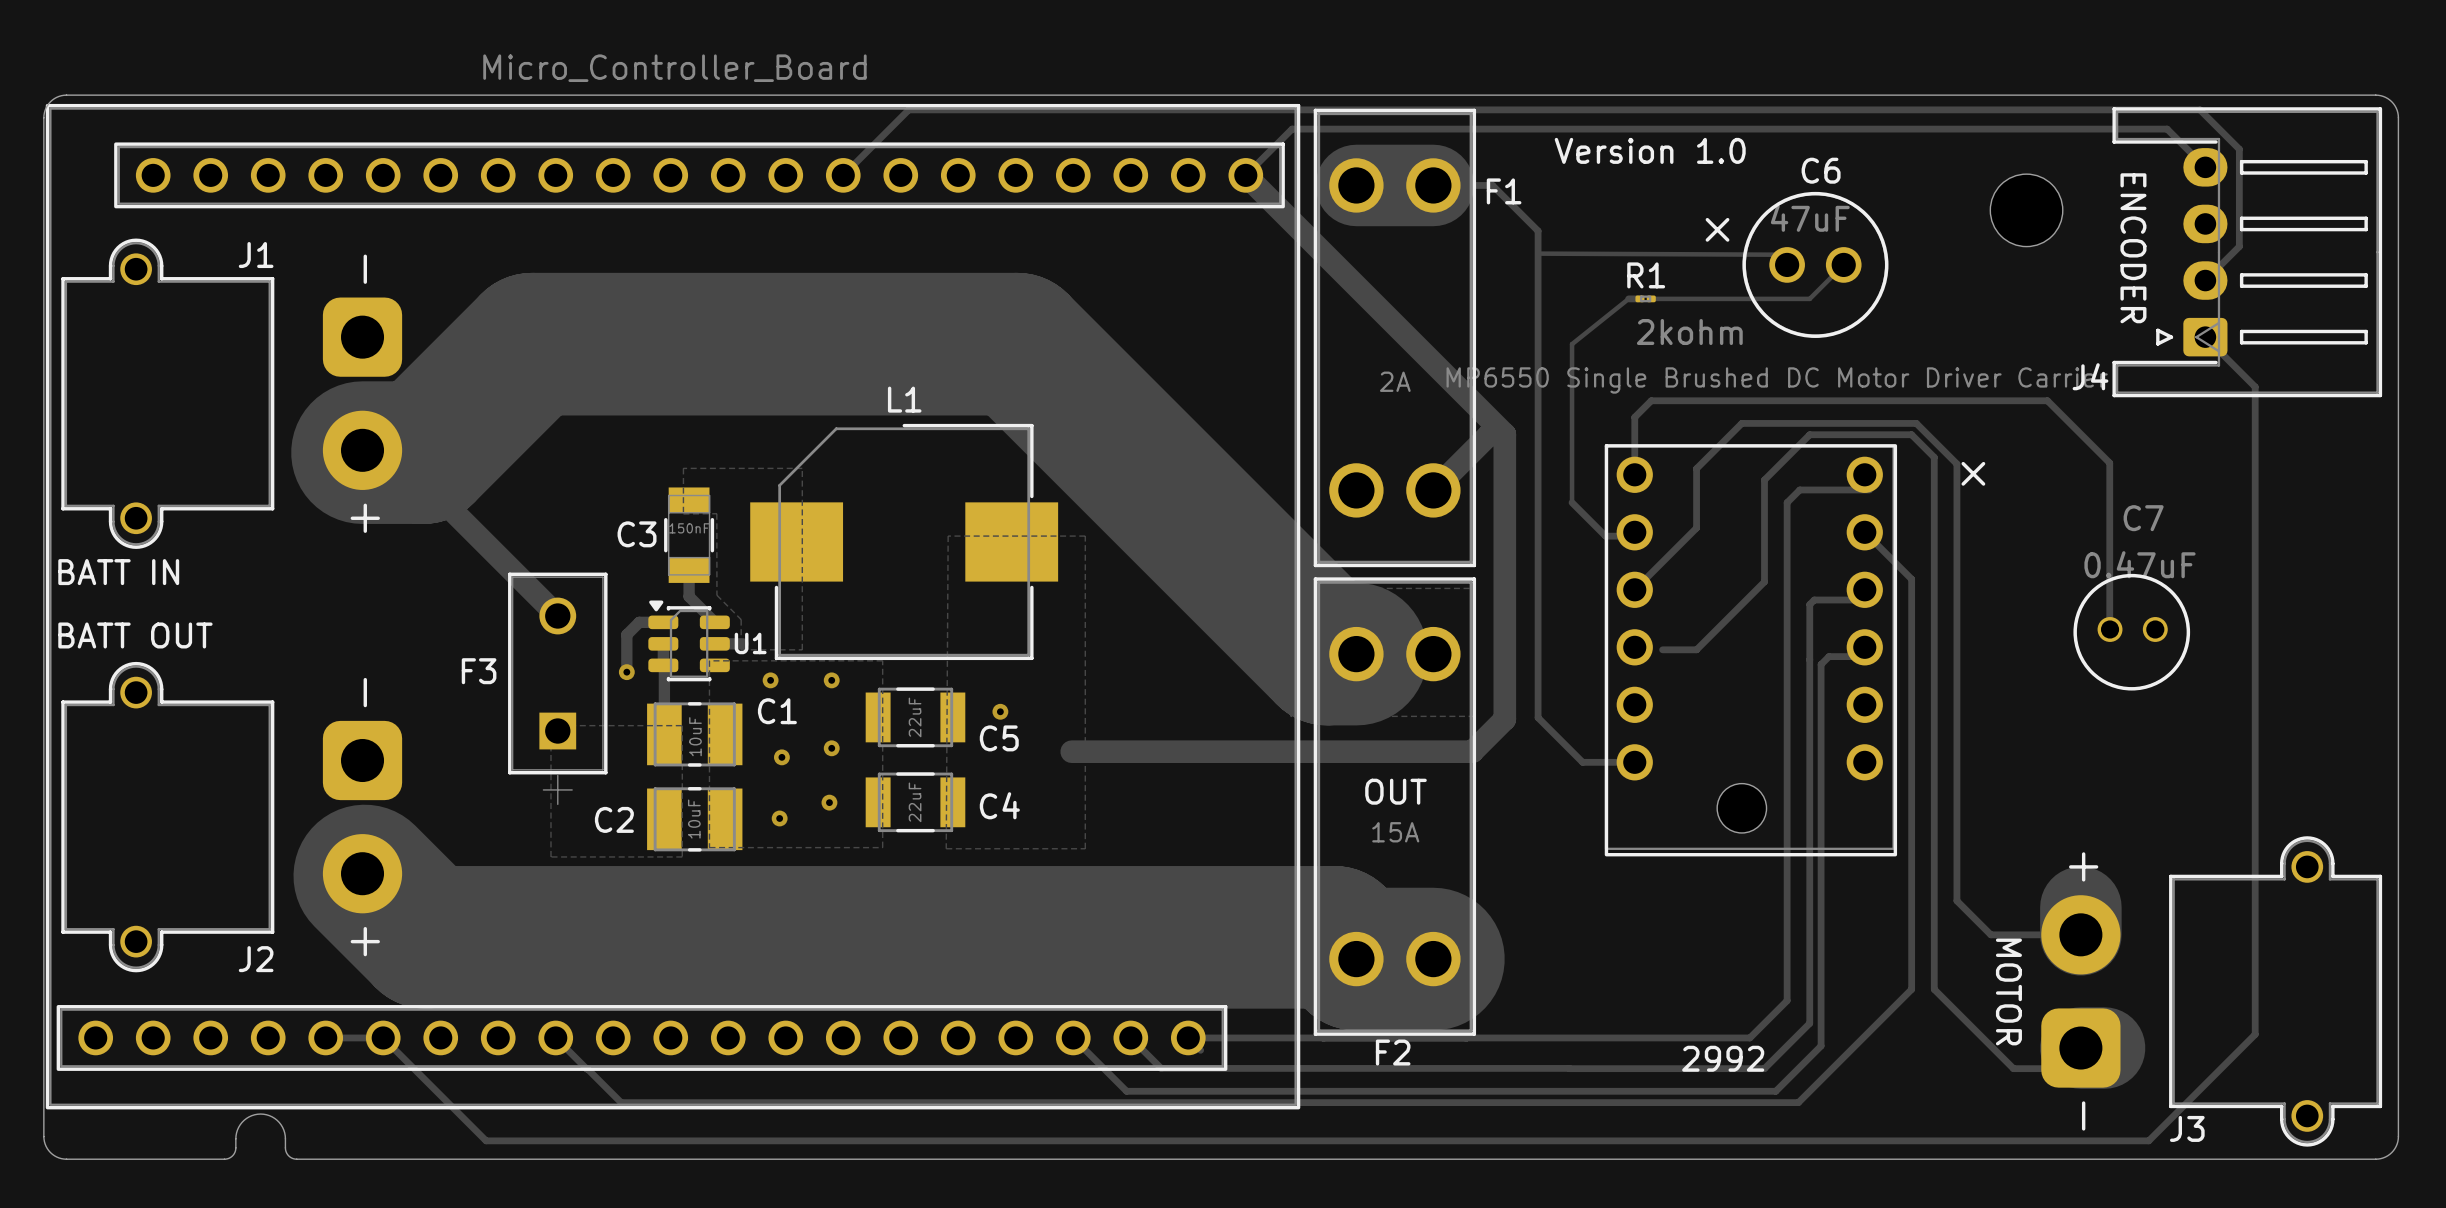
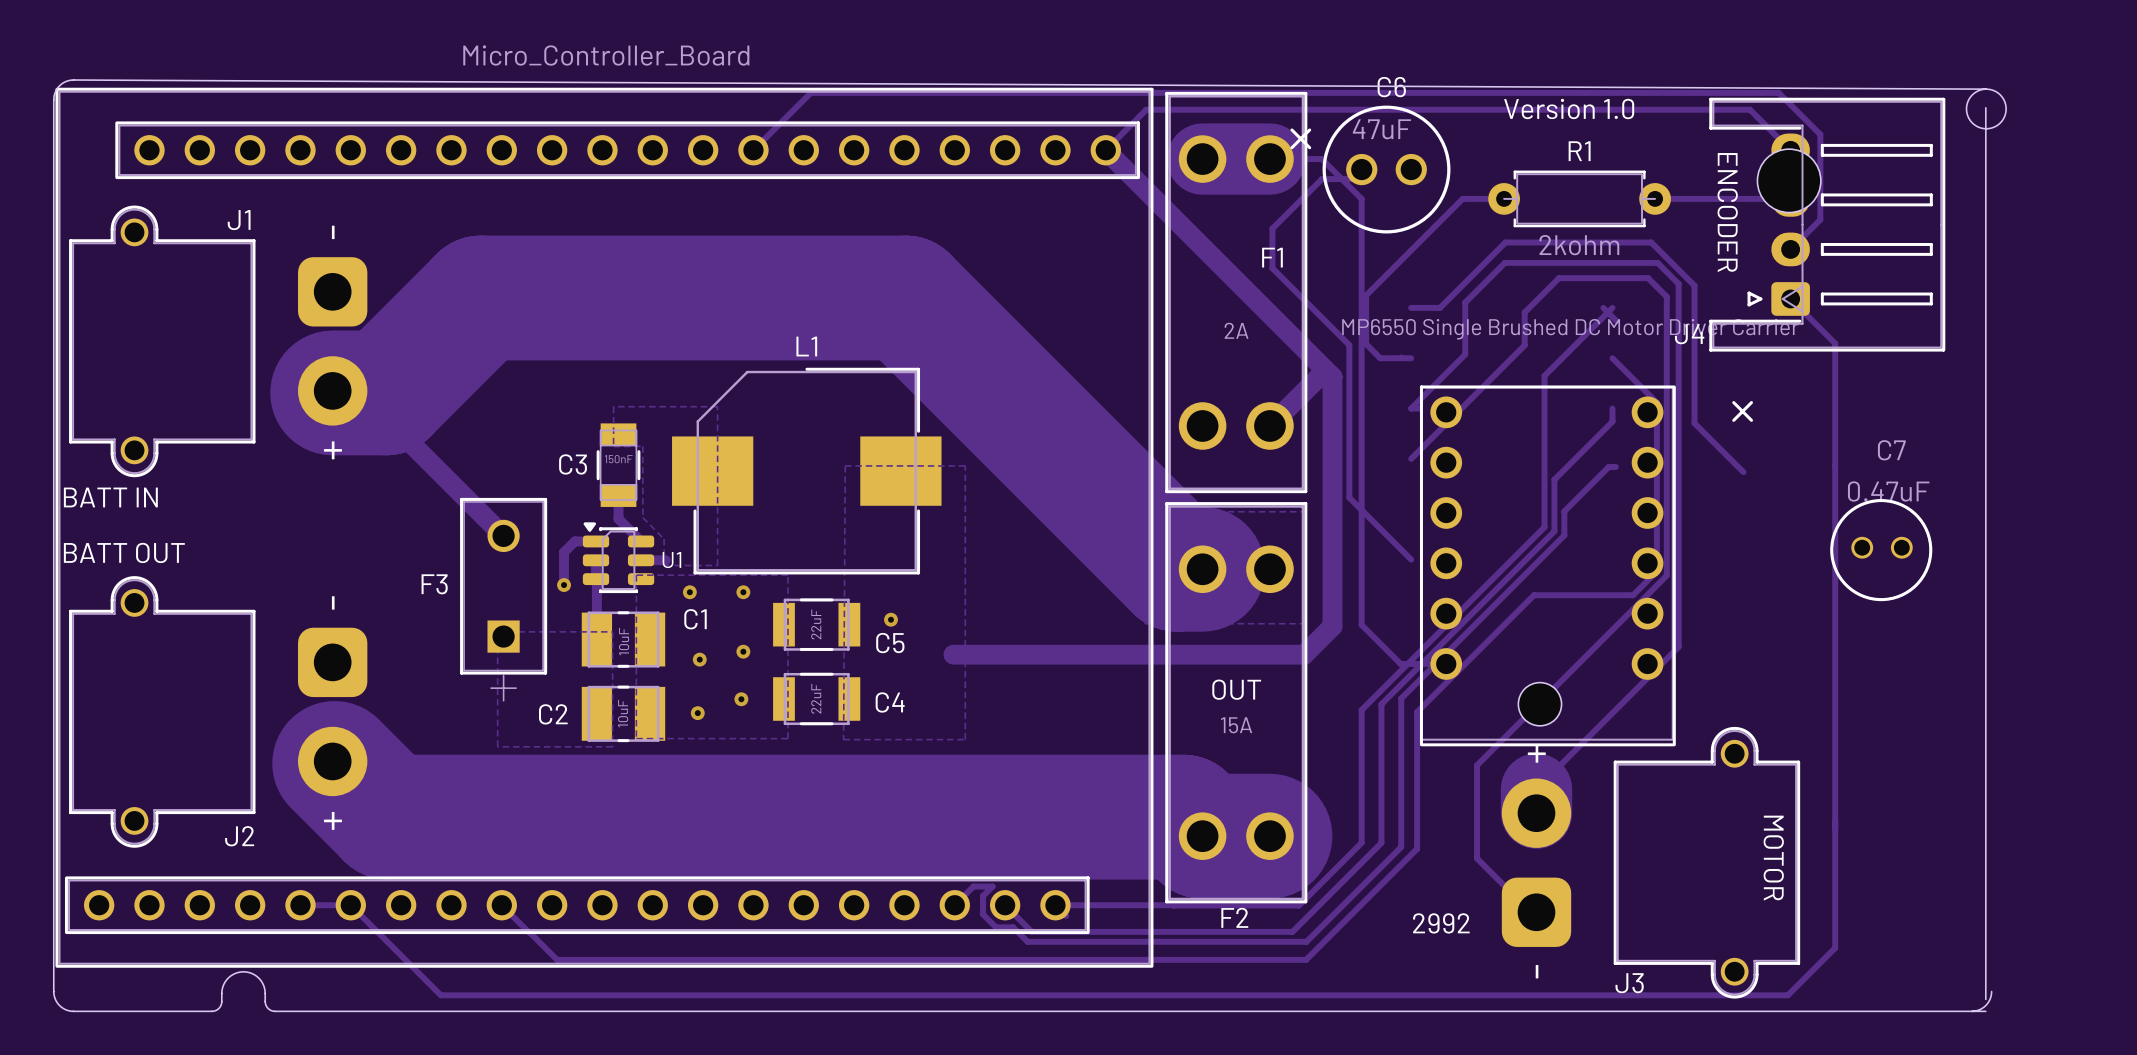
board edge: (66, 95) (2375, 95) (2385, 97) (2394, 105) (2398, 117) (2398, 1139) (2391, 1152) (2378, 1159) (2251, 1159) -> (73, 80) (1985, 89) (1972, 95) (1966, 109) (1972, 123) (1986, 128) (2000, 122) (2006, 108) (2000, 94) (1986, 89)
track: (2014, 109) (2200, 109) (2239, 149) (2239, 246) (2205, 280) -> (1778, 92) (1820, 134) (1820, 219) (1790, 249)
board edge: none -> (1985, 107) (1985, 999)
track: (1981, 129) (2167, 129) (2205, 167) -> (1750, 109) (1790, 150)
text position: Version 1.0 (1650, 150) -> Version 1.0 (1569, 108)
F1 name position: F1 (1504, 191) -> F1 (1272, 257)
track: none -> (1361, 169) (1352, 179) (1321, 179) (1272, 228) (1272, 268) (1349, 345) (1349, 497) (1411, 559)
track: none -> (1500, 198) (1462, 198) (1366, 295) (1366, 344) (1380, 358) (1411, 358)
track: none -> (1655, 198) (1790, 199)
text position: ENCODER (2133, 248) -> ENCODER (1727, 212)
J4 position: (2247, 252) -> (1827, 224)
track: (1538, 253) (1787, 254) -> none
C6 position: (1797, 264) -> (1370, 169)
track: (1843, 264) (1809, 298) (1651, 298) -> none
R1 footprint: [1635, 295, 1656, 303] -> [1488, 170, 1671, 228]
track: (1638, 298) (1628, 298) (1572, 344) (1572, 502) (1605, 536) (1643, 536) -> none
R1 value position: 2kohm (1689, 332) -> 2kohm (1579, 245)
track: (2205, 337) (2255, 386) (2255, 1034) (2148, 1140) (2025, 1140) -> (1790, 298) (1835, 343) (1835, 947) (1787, 995)
track: none -> (1411, 307) (1440, 307) (1505, 242) (1651, 242) (1694, 285) (1694, 423) (1743, 472)
track: none -> (1603, 307) (1616, 321)
track: none -> (1418, 408) (1411, 408) (1465, 354) (1465, 302) (1504, 262) (1657, 262) (1678, 283) (1678, 646) (1536, 789) (1536, 813)
track: (1634, 474) (1634, 417) (1651, 400) (2047, 400) (2109, 463) (2109, 633) (2112, 636) -> none
track: (1869, 489) (1799, 489) (1787, 502) (1787, 1000) (1749, 1037) (1466, 1037) -> (1612, 307) (1544, 375) (1544, 527) (1361, 710) (1361, 842) (1299, 905)
track: none -> (1411, 458) (1524, 345) (1524, 312) (1558, 278) (1648, 278) (1666, 296) (1666, 575) (1477, 765) (1477, 858) (1546, 927)
track: (1864, 532) (1911, 579) (1911, 989) (1798, 1102) (621, 1102) (618, 1100) -> (1612, 358) (1656, 402) (1656, 571) (1633, 595) (1534, 595) (1417, 712) (1417, 848) (1306, 959) (557, 959)
track: (1643, 589) (1634, 589) (1696, 528) (1696, 468) (1741, 423) (1916, 423) (1956, 463) (1956, 900) (1990, 934) (2080, 934) (2080, 907) -> none
track: (1869, 600) (1814, 600) (1809, 604) (1809, 1023) (1764, 1068) (1569, 1068) -> none
track: (1662, 649) (1696, 649) (1764, 581) (1764, 480) (1809, 434) (1911, 434) (1934, 457) (1934, 989) (2013, 1068) (2060, 1068) (2080, 1048) (2104, 1048) -> none
track: (1868, 656) (1828, 656) (1821, 664) (1821, 1046) (1775, 1091) (1126, 1091) (1073, 1037) -> (1615, 467) (1608, 467) (1564, 511) (1564, 535) (1401, 698) (1401, 847) (1306, 941) (1027, 941) (1013, 927) (995, 927) (983, 914) (983, 896) (992, 886) (973, 886) (954, 905)
J3 position: (2211, 991) -> (1650, 862)
text position: 2992 (1723, 1058) -> 2992 (1441, 923)
track: (1459, 1068) (1569, 1068) -> (1292, 931) (1381, 842) (1381, 704) (1554, 531) (1554, 479) (1612, 421) (1612, 408)
board edge: none -> (1991, 991) (1985, 1005) (1971, 1011)

